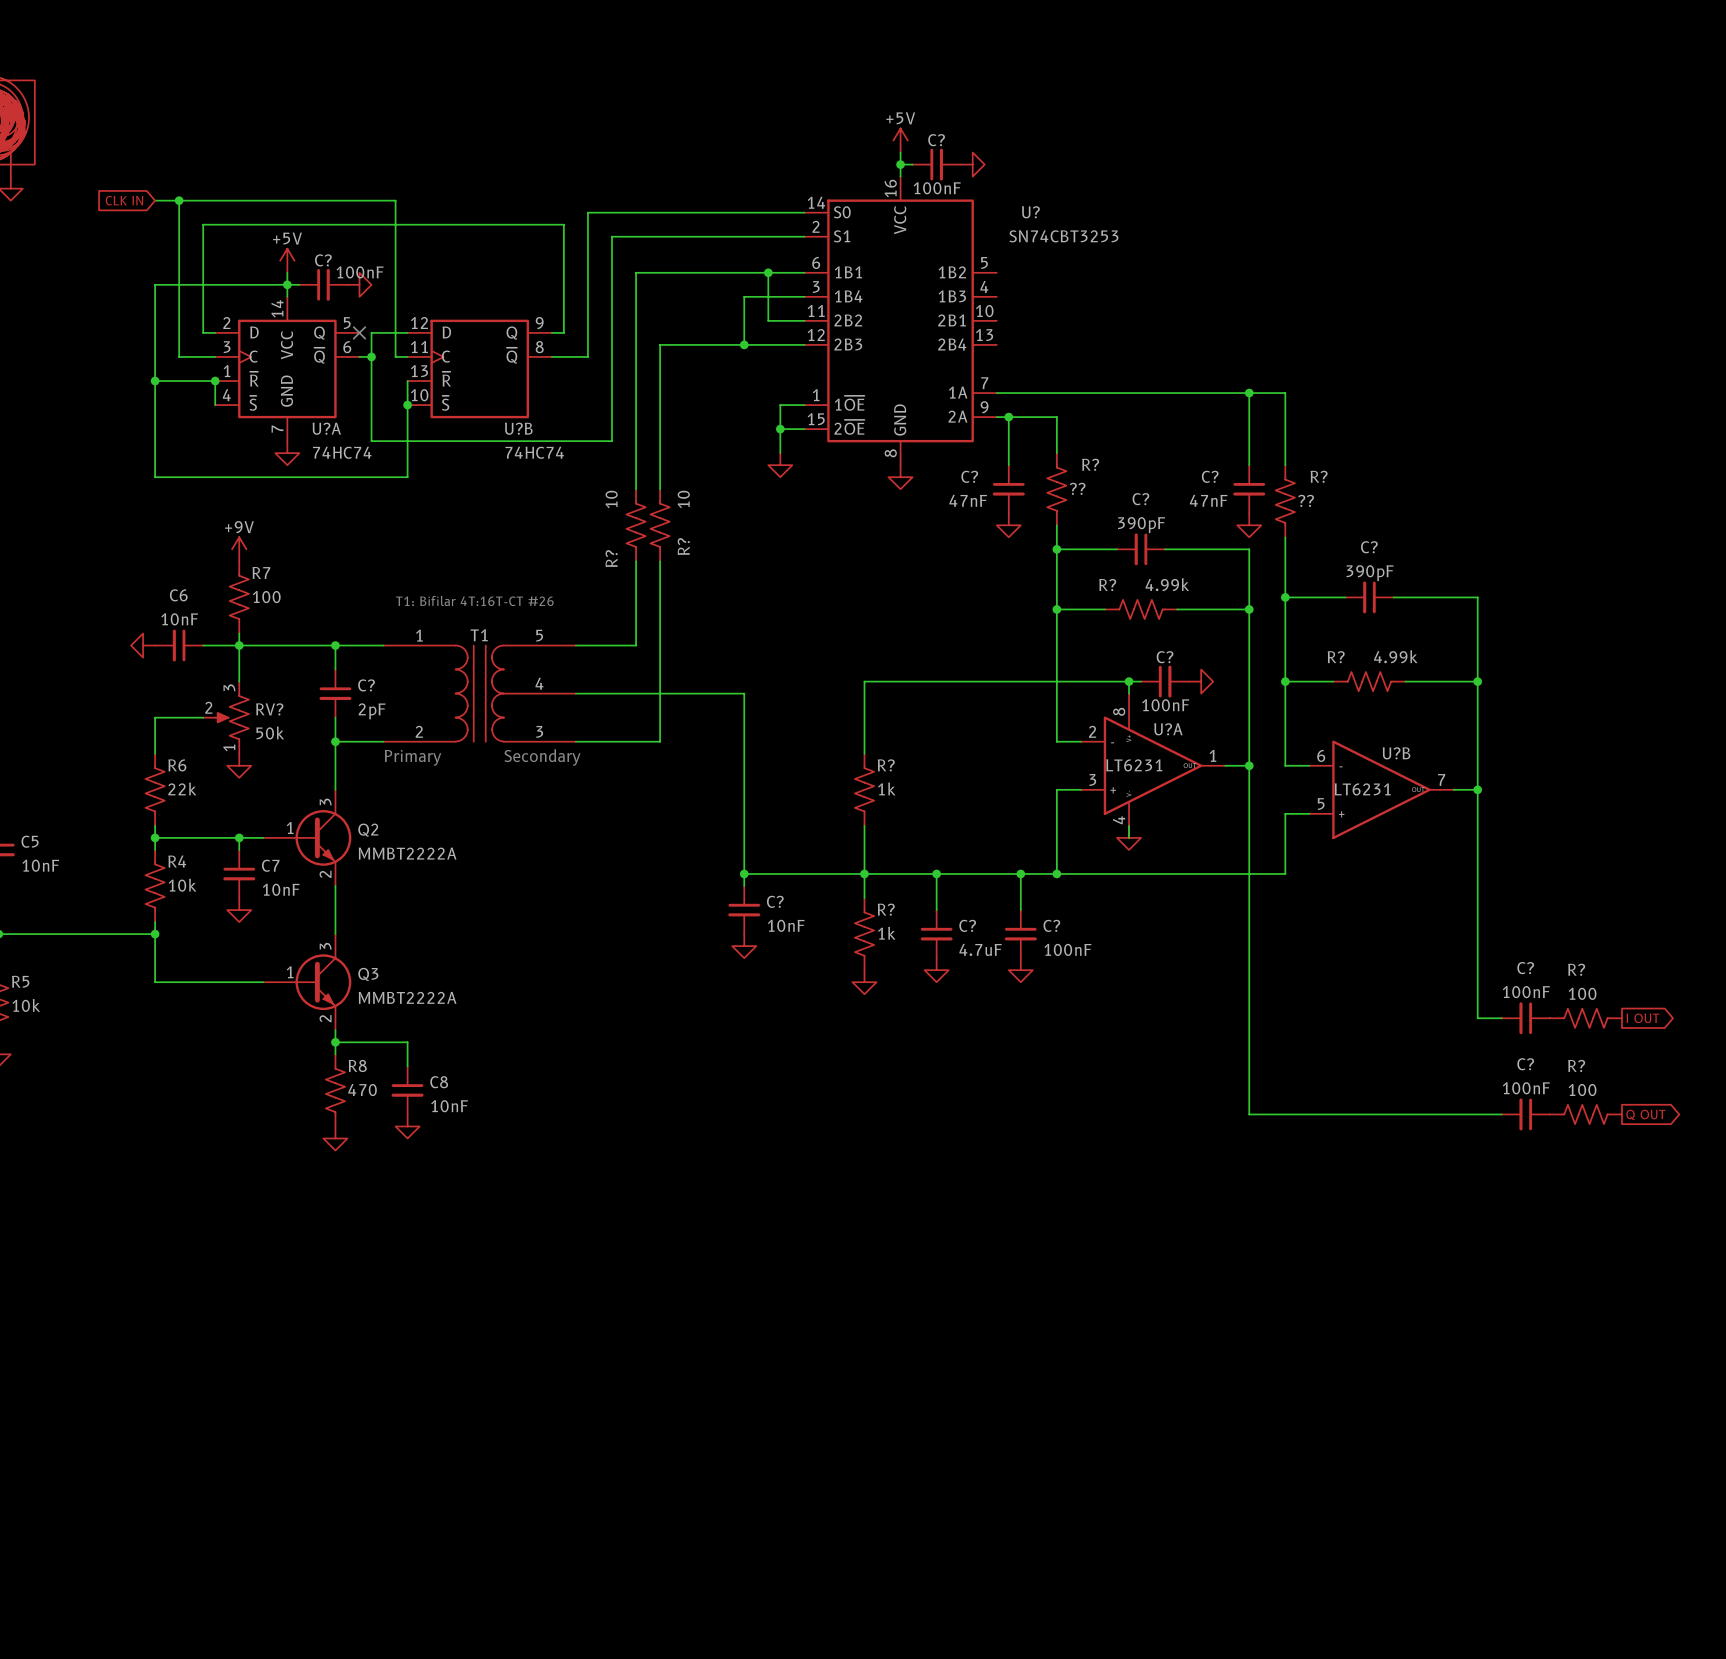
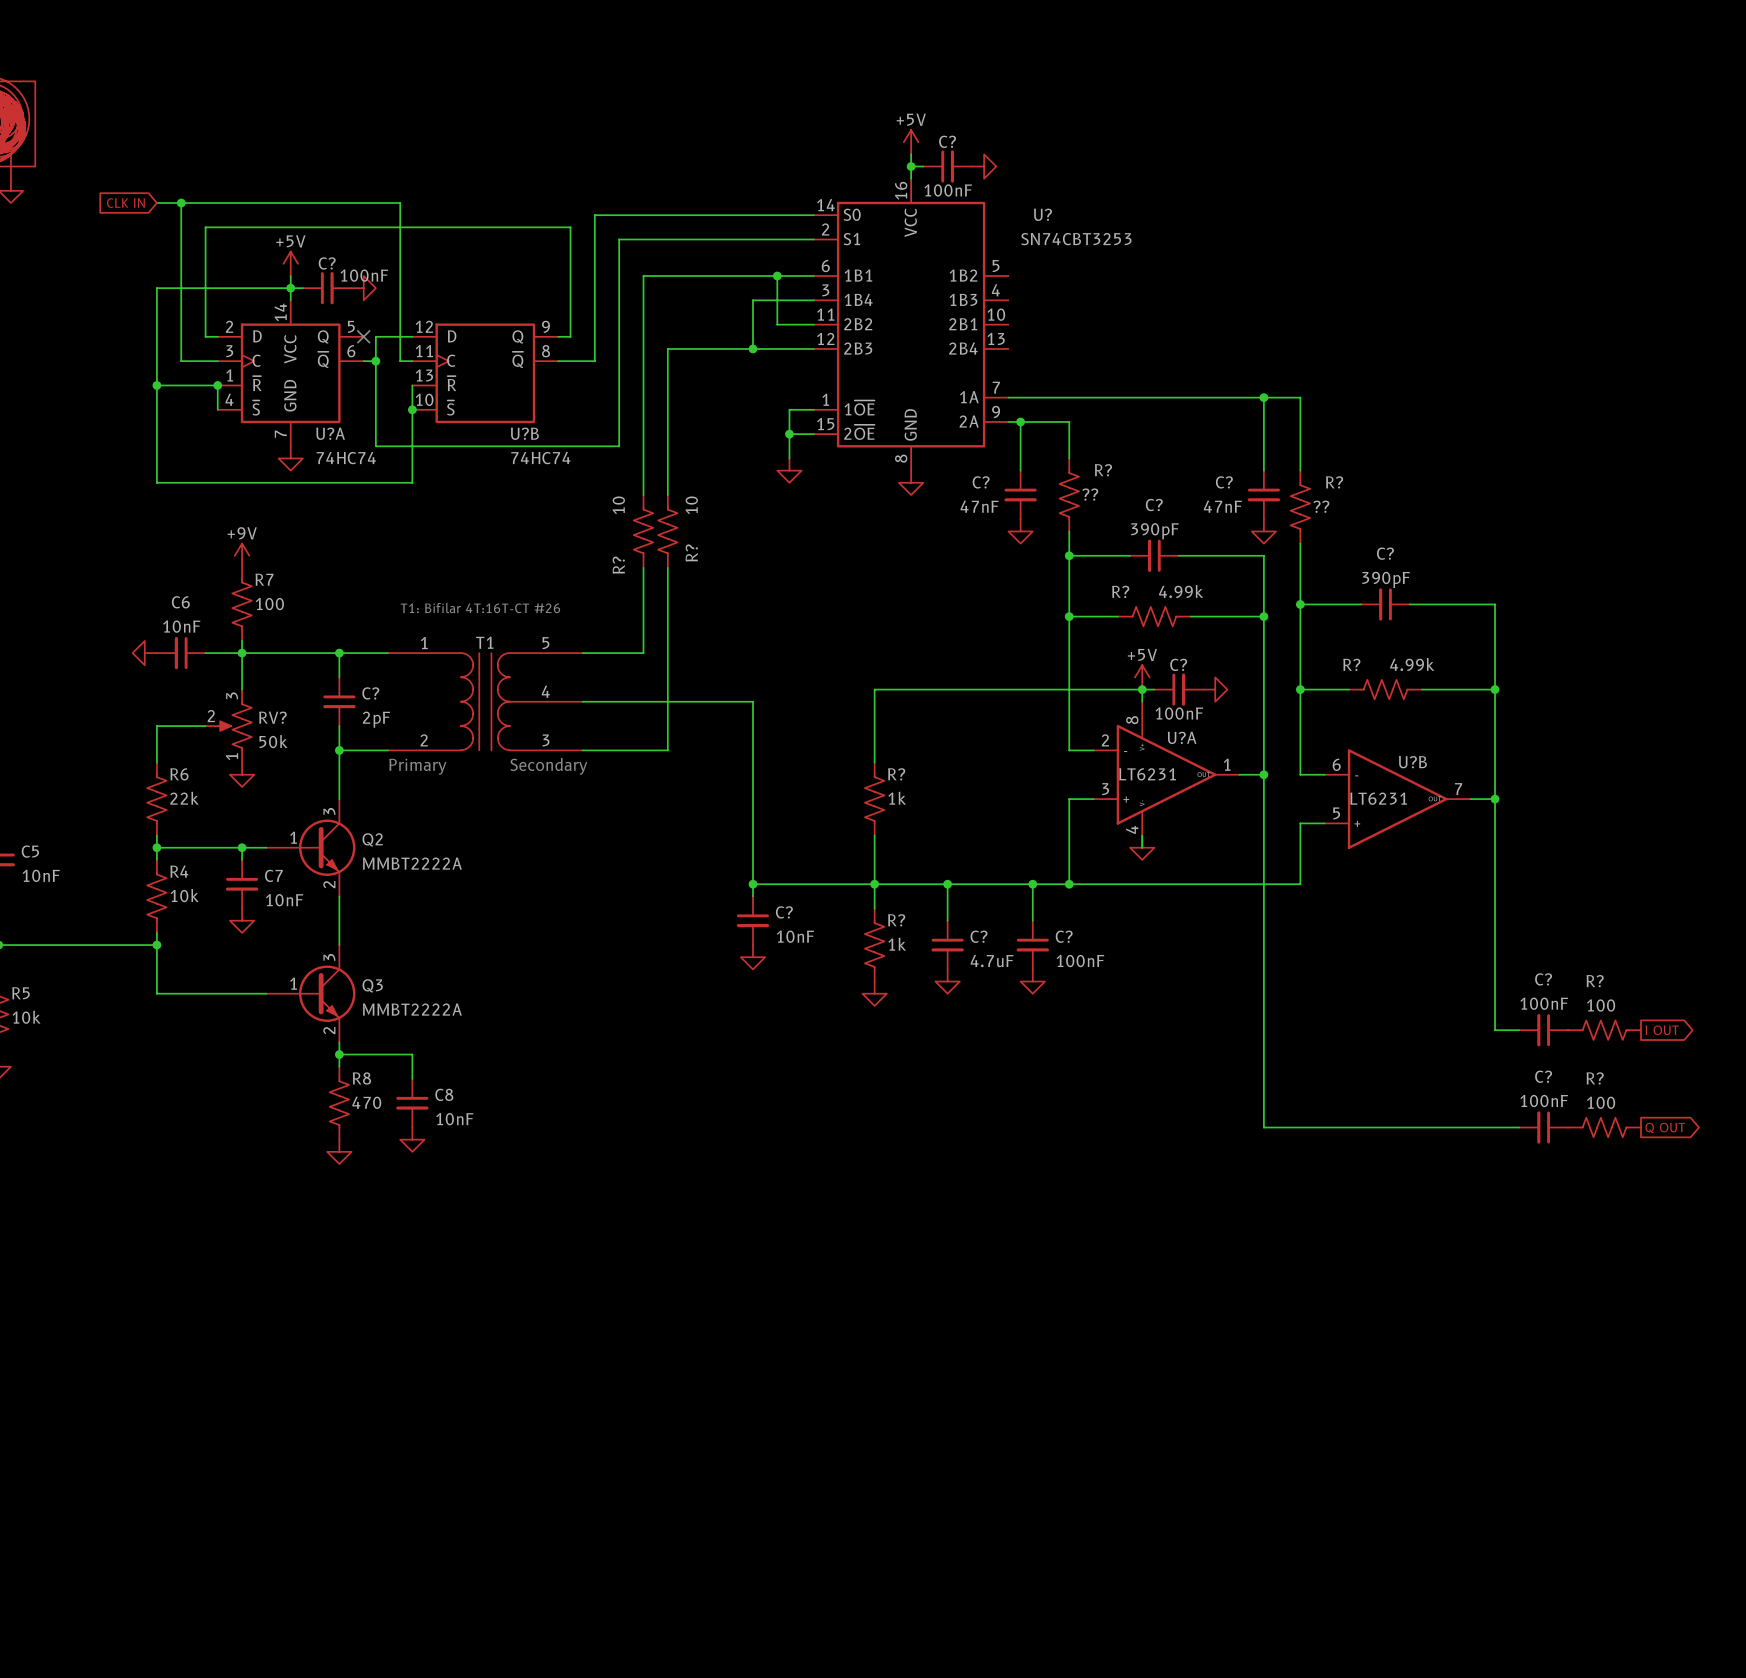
power symbol: none -> +5V (1142, 677)

